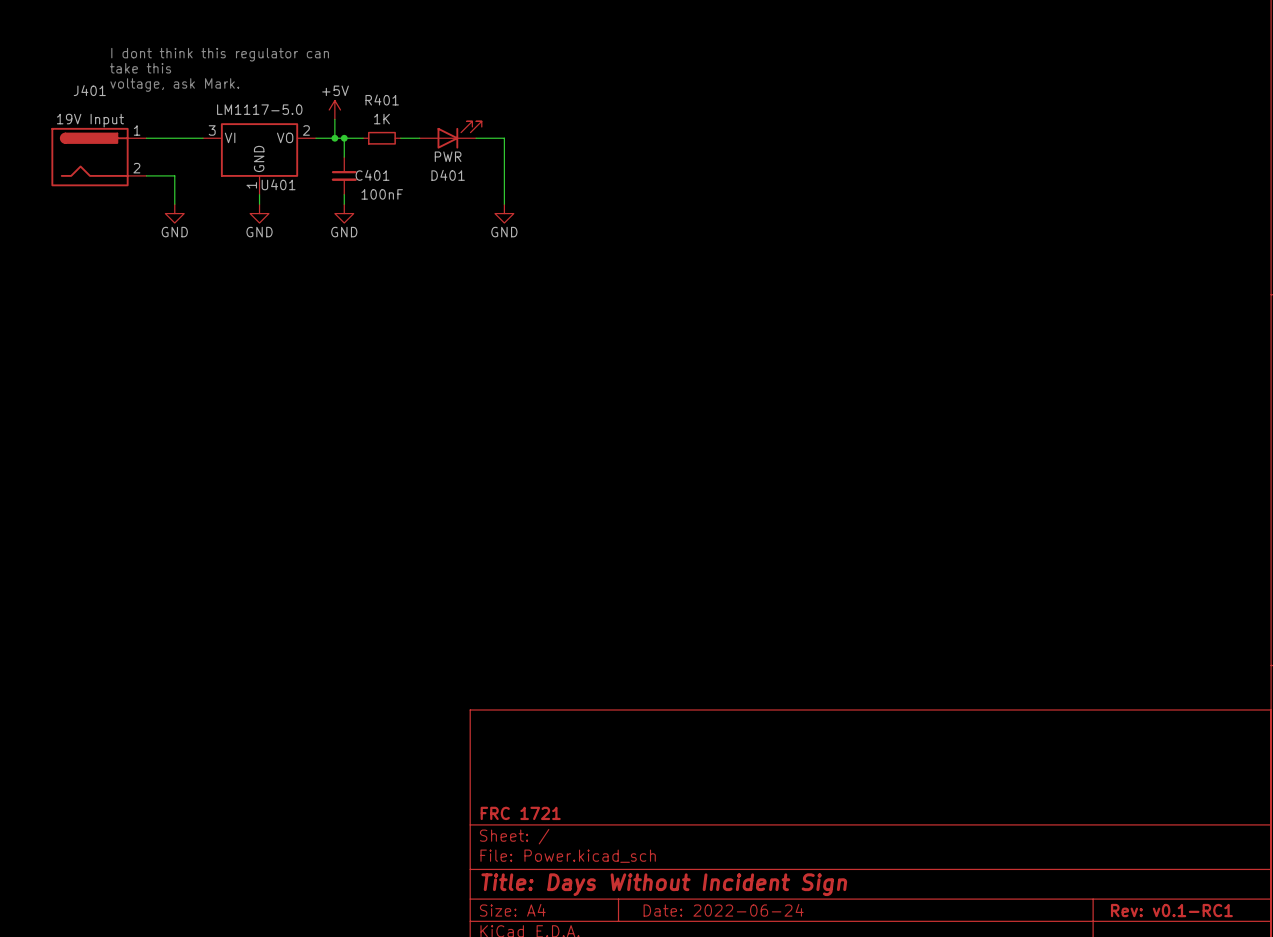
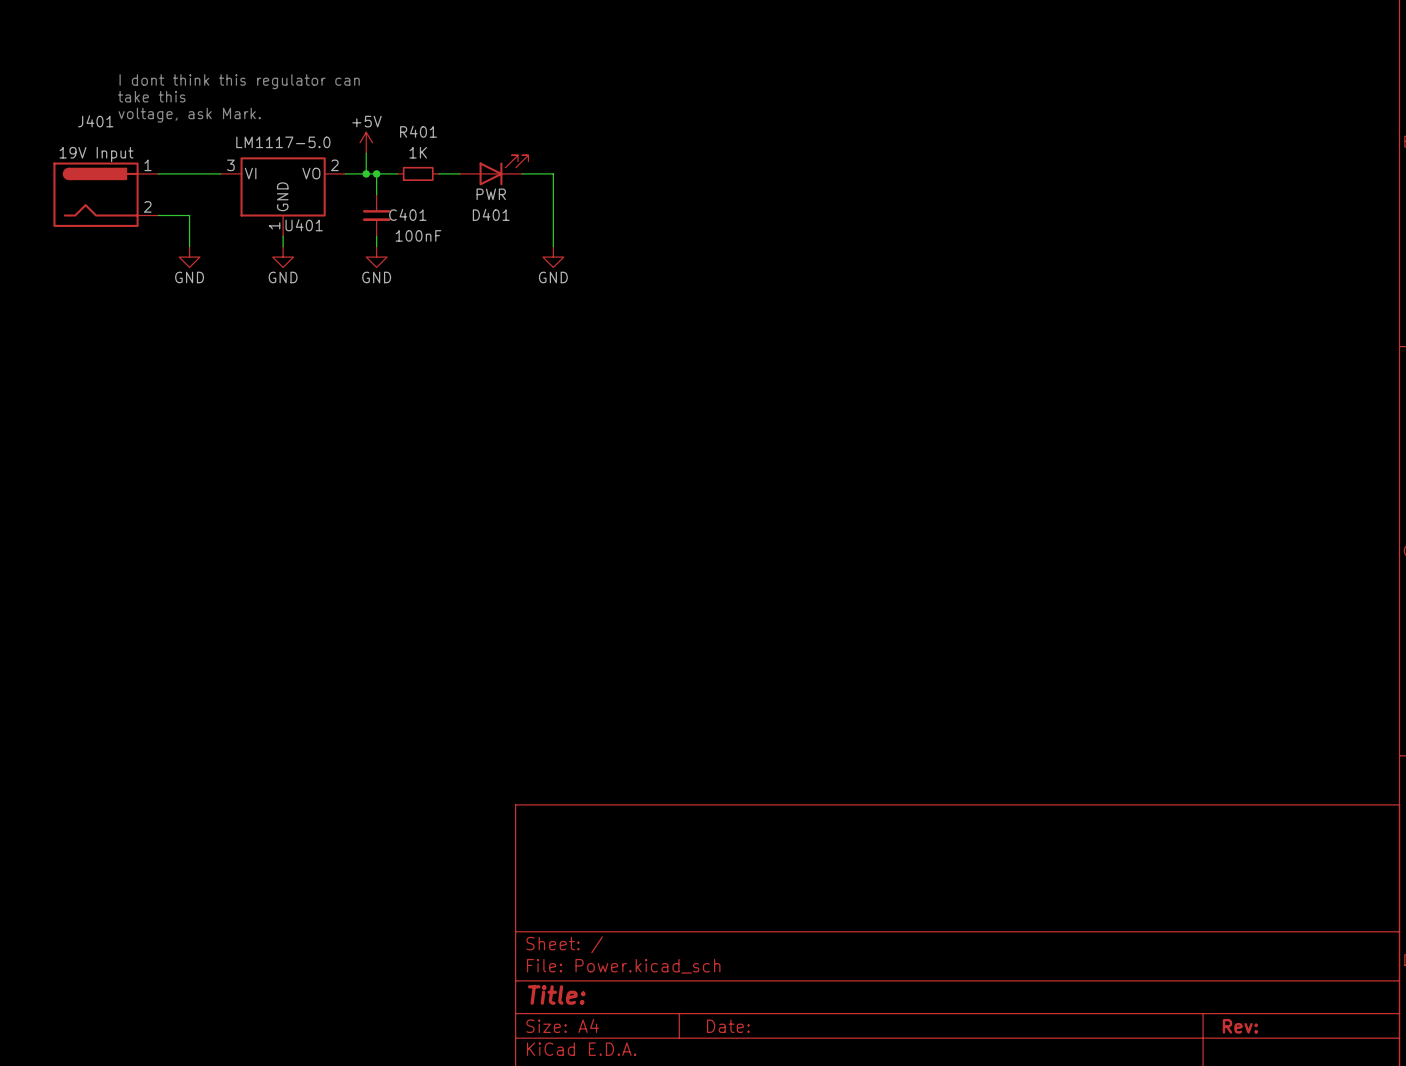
title block: FRC 1721 (520, 813) -> none
title block: Title: Days Without Incident Sign (664, 884) -> Title: (556, 995)
title block: Date: 2022-06-24 (723, 910) -> Date: (728, 1026)
title block: Rev: v0.1-RC1 (1171, 910) -> Rev: (1240, 1026)

